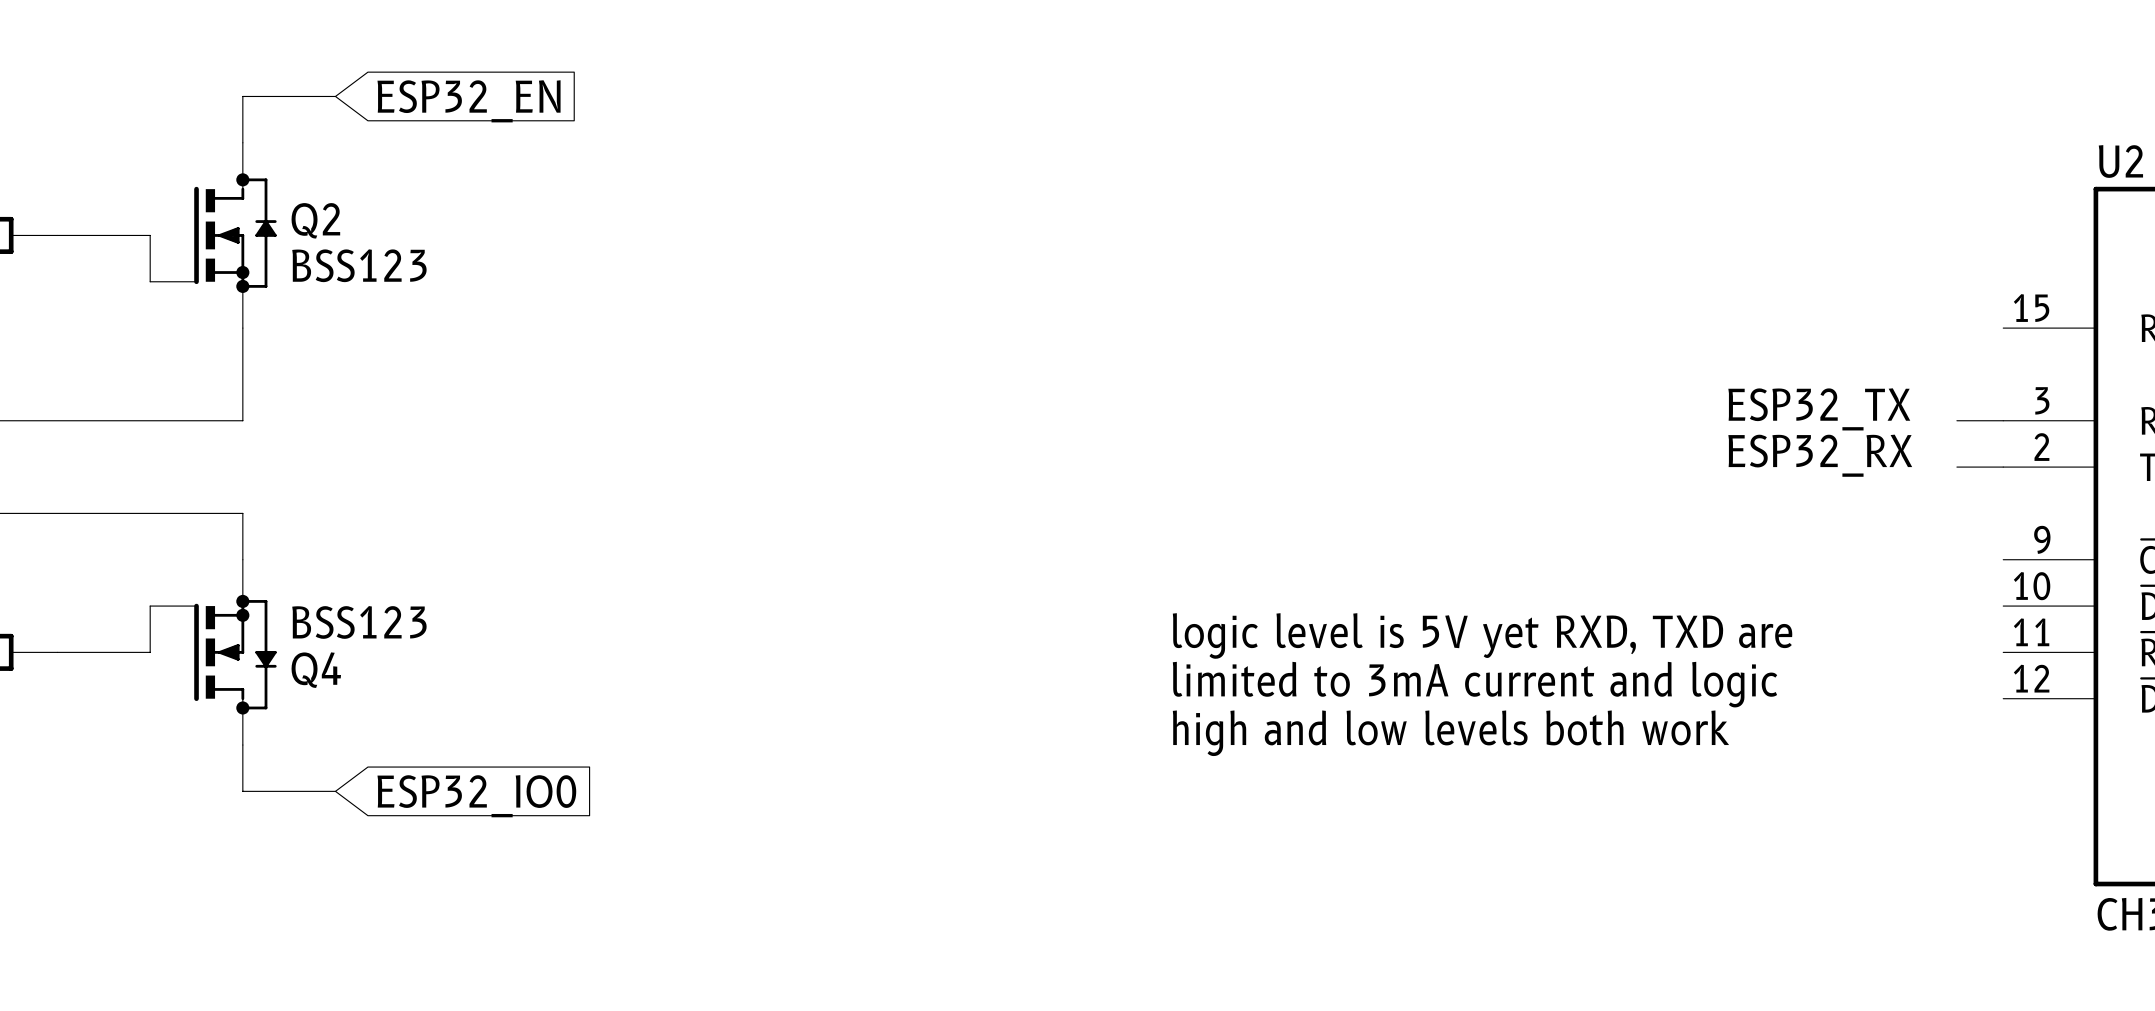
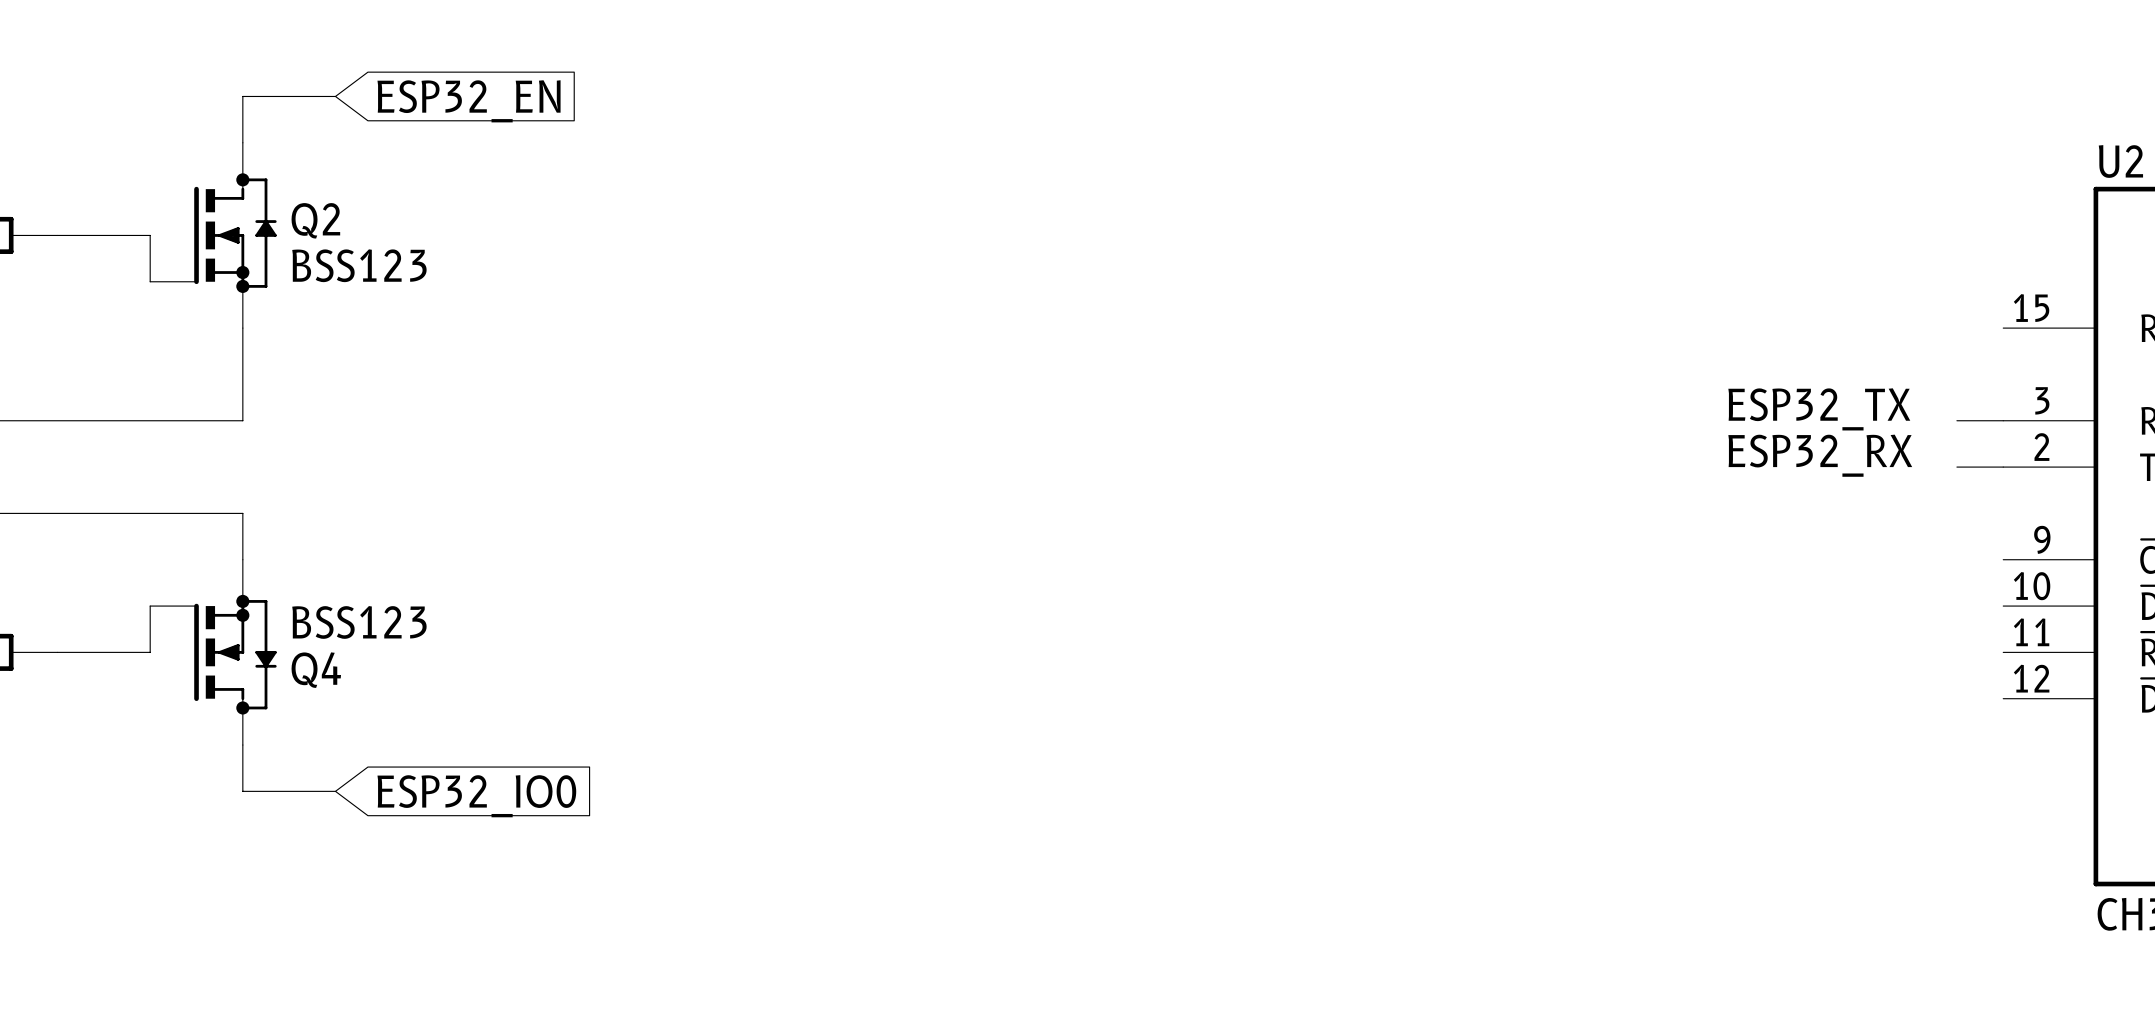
text: logic level is 5V yet RXD, TXD are (1482, 635) -> none
text: limited to 3mA current and logic (1475, 684) -> none
text: high and low levels both work (1450, 733) -> none

